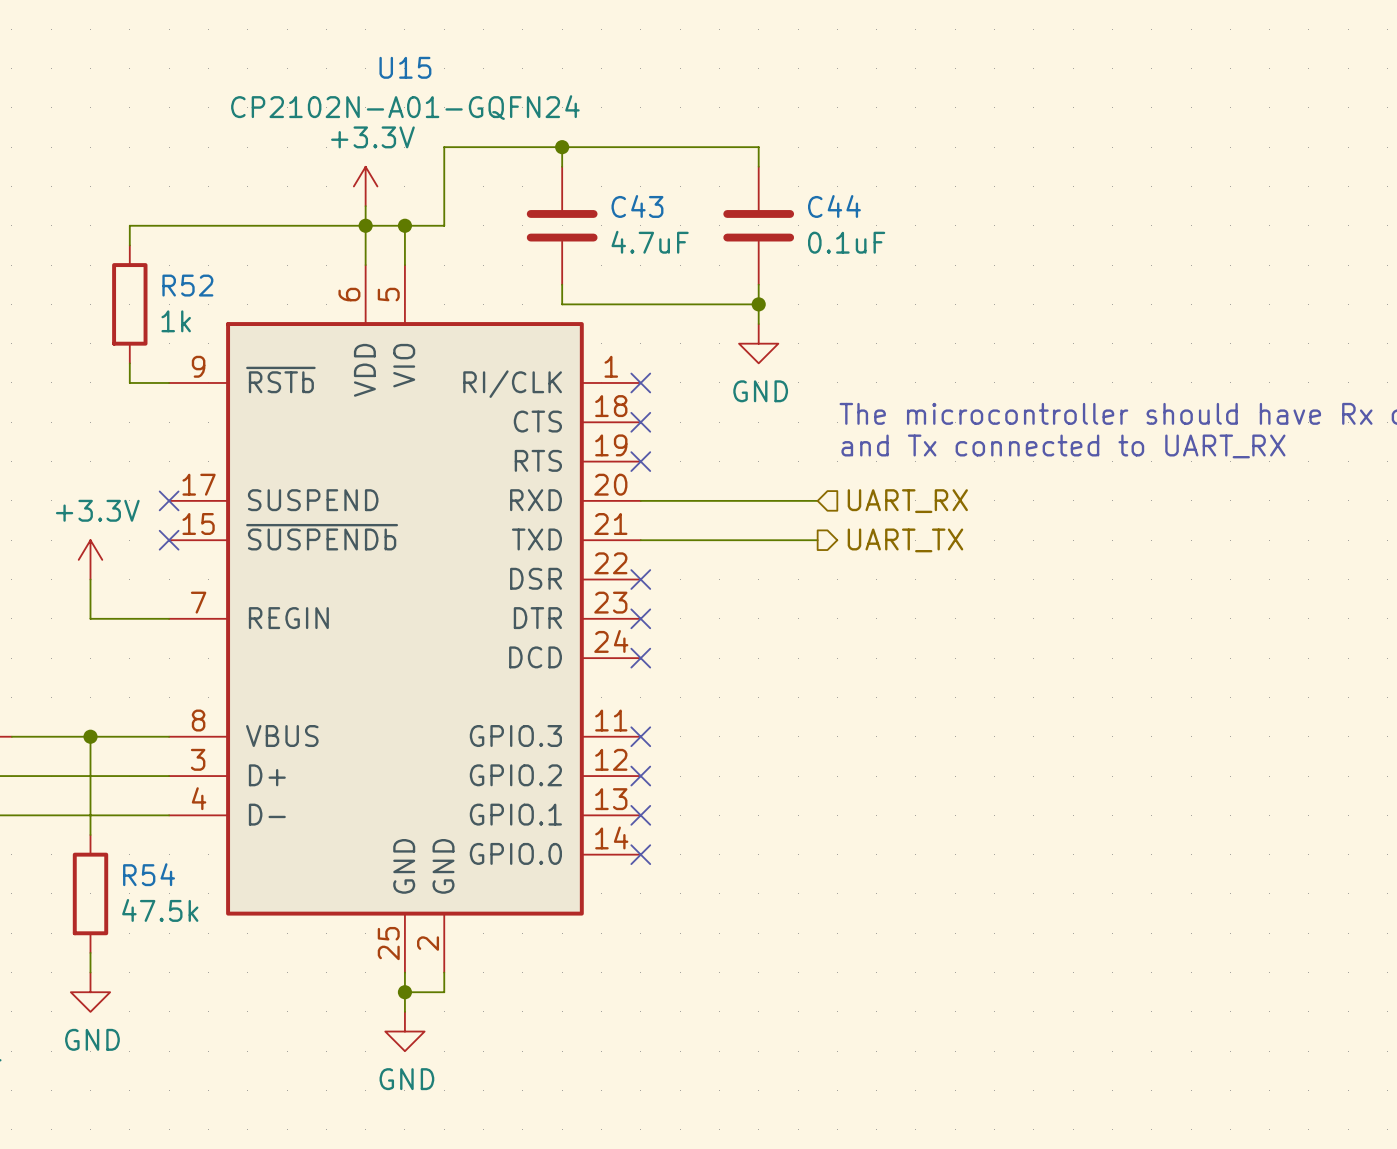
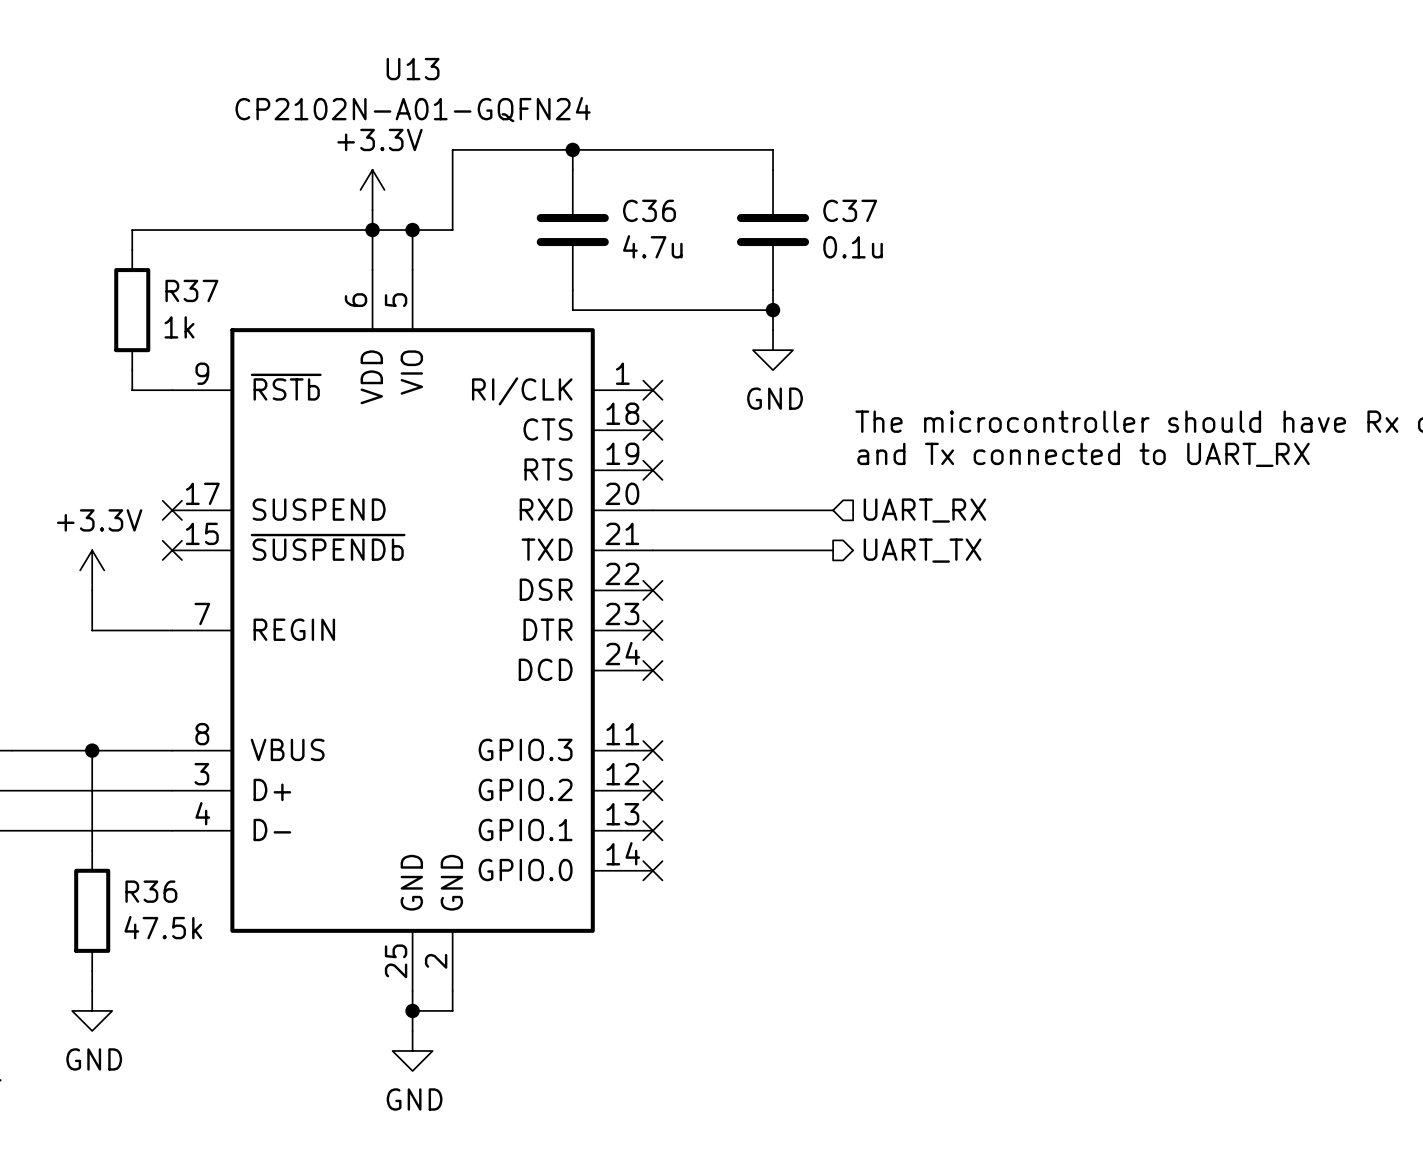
U15 name: U15 (405, 67) -> U13 (413, 69)
C43 name: C43 (637, 206) -> C36 (649, 210)
C44 name: C44 (834, 206) -> C37 (850, 210)
C43 value: 4.7uF (650, 242) -> 4.7u (652, 246)
C44 value: 0.1uF (846, 242) -> 0.1u (853, 247)
R52 name: R52 (187, 285) -> R37 (191, 290)
R54 name: R54 (149, 874) -> R36 (151, 891)

